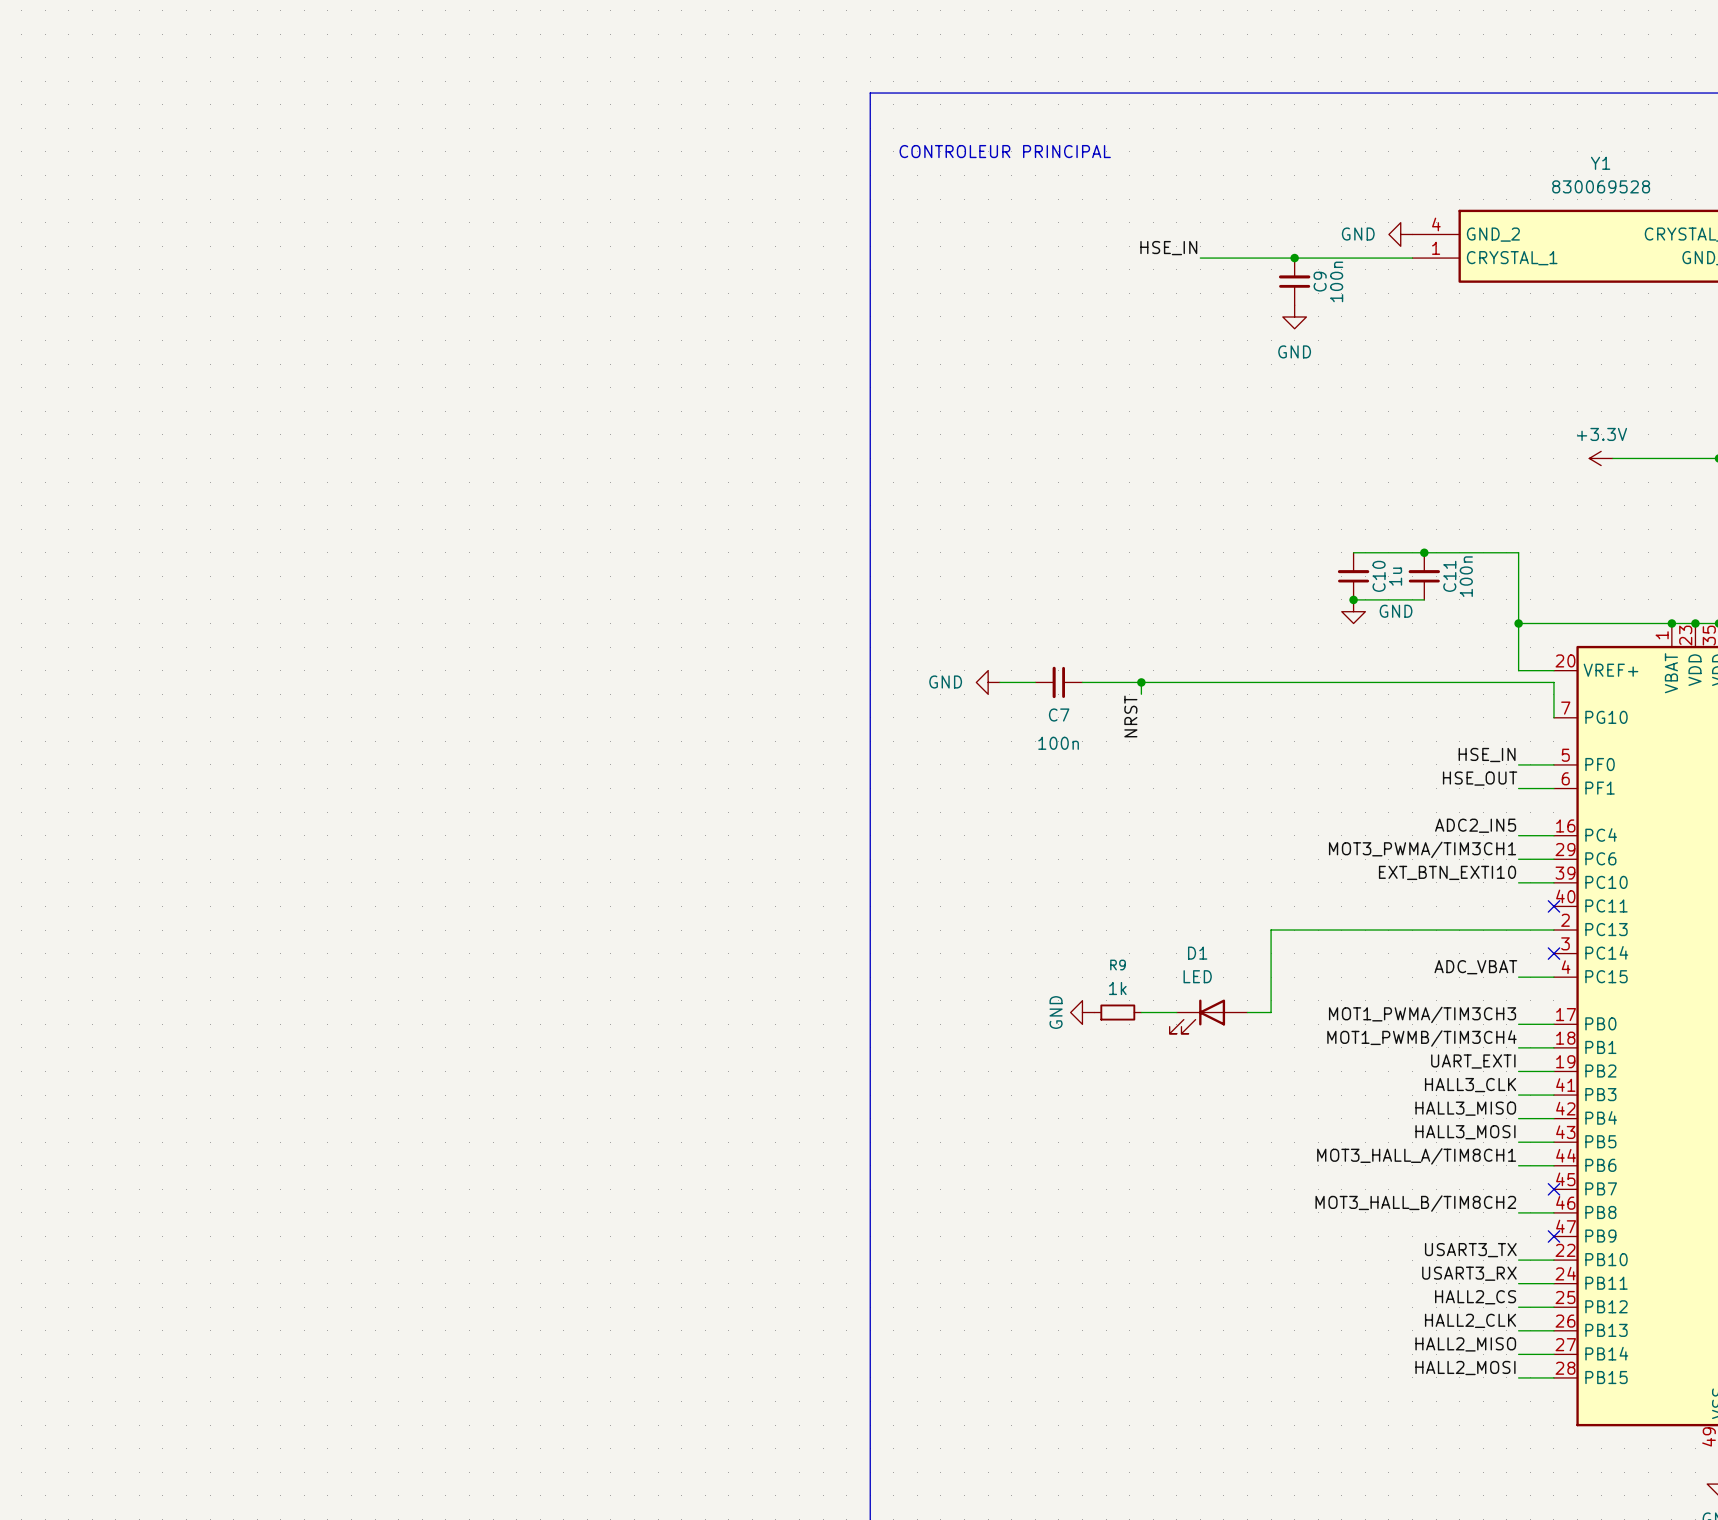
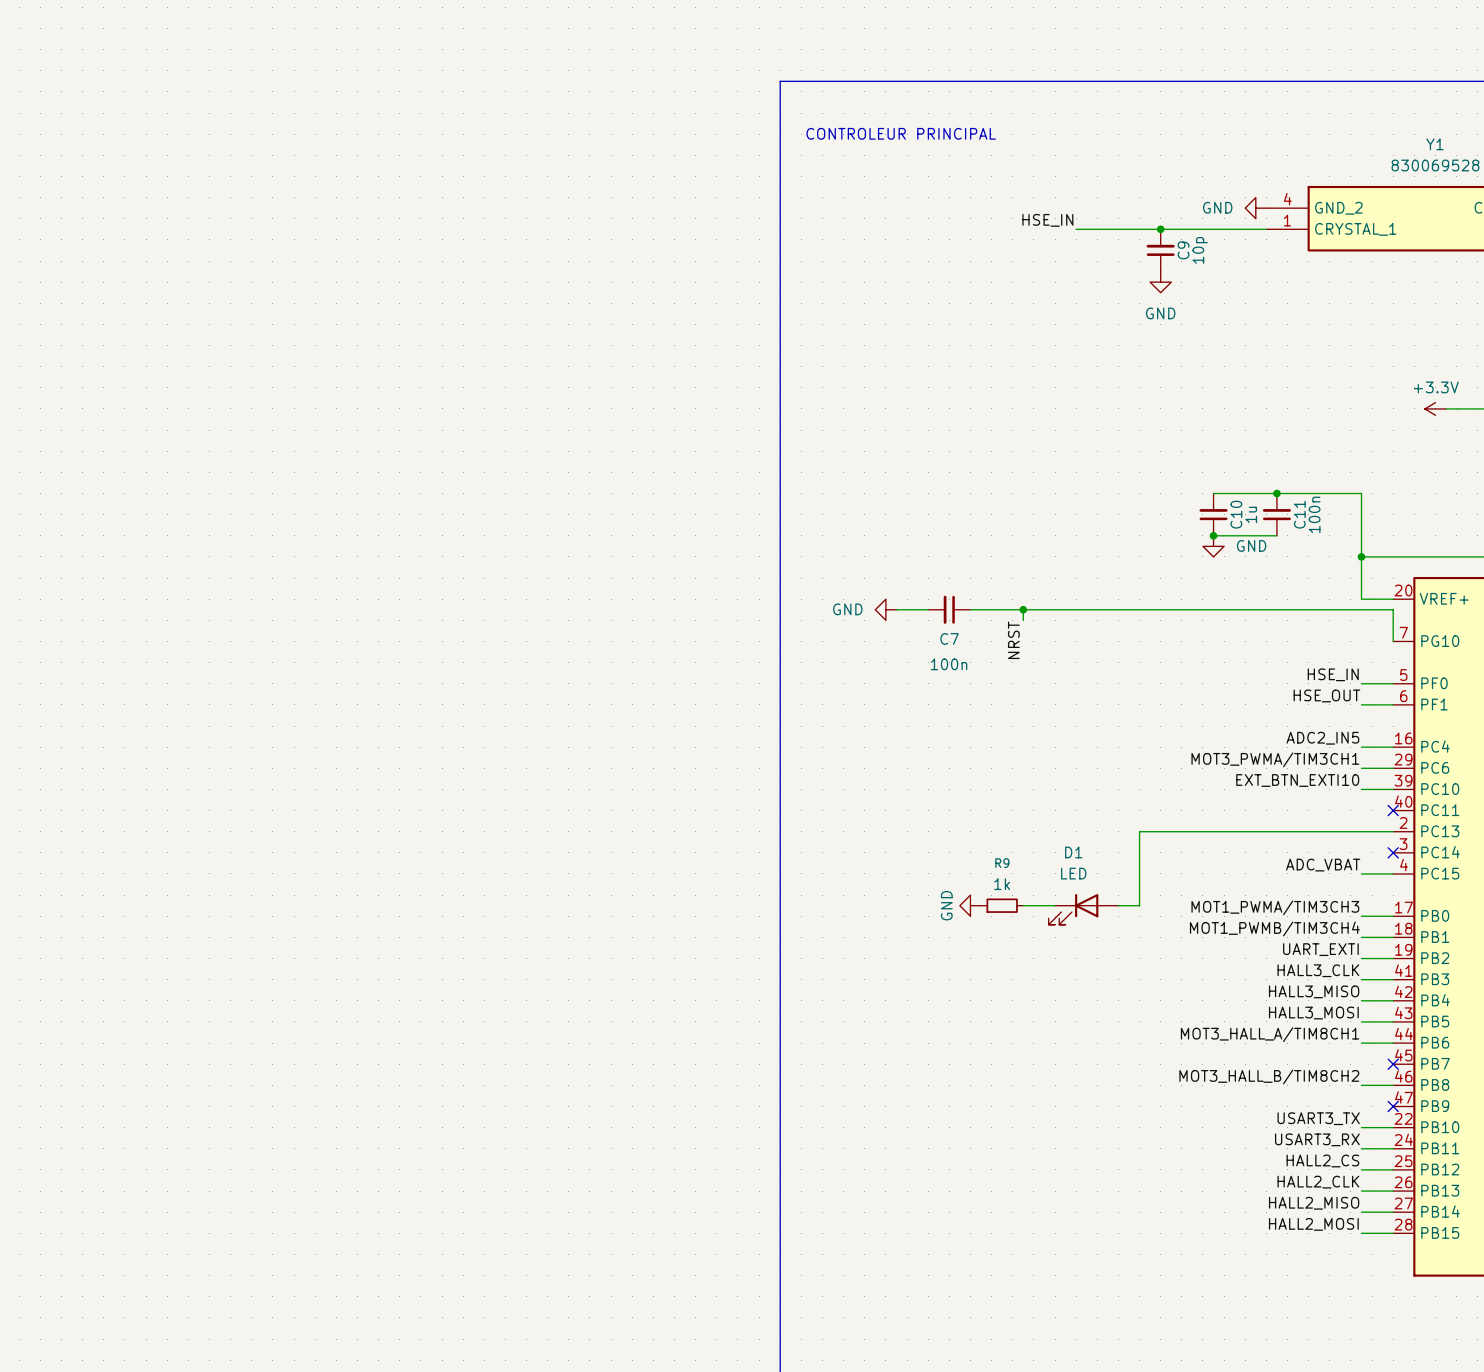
C9 value: 100n (1336, 281) -> 10p (1200, 250)

